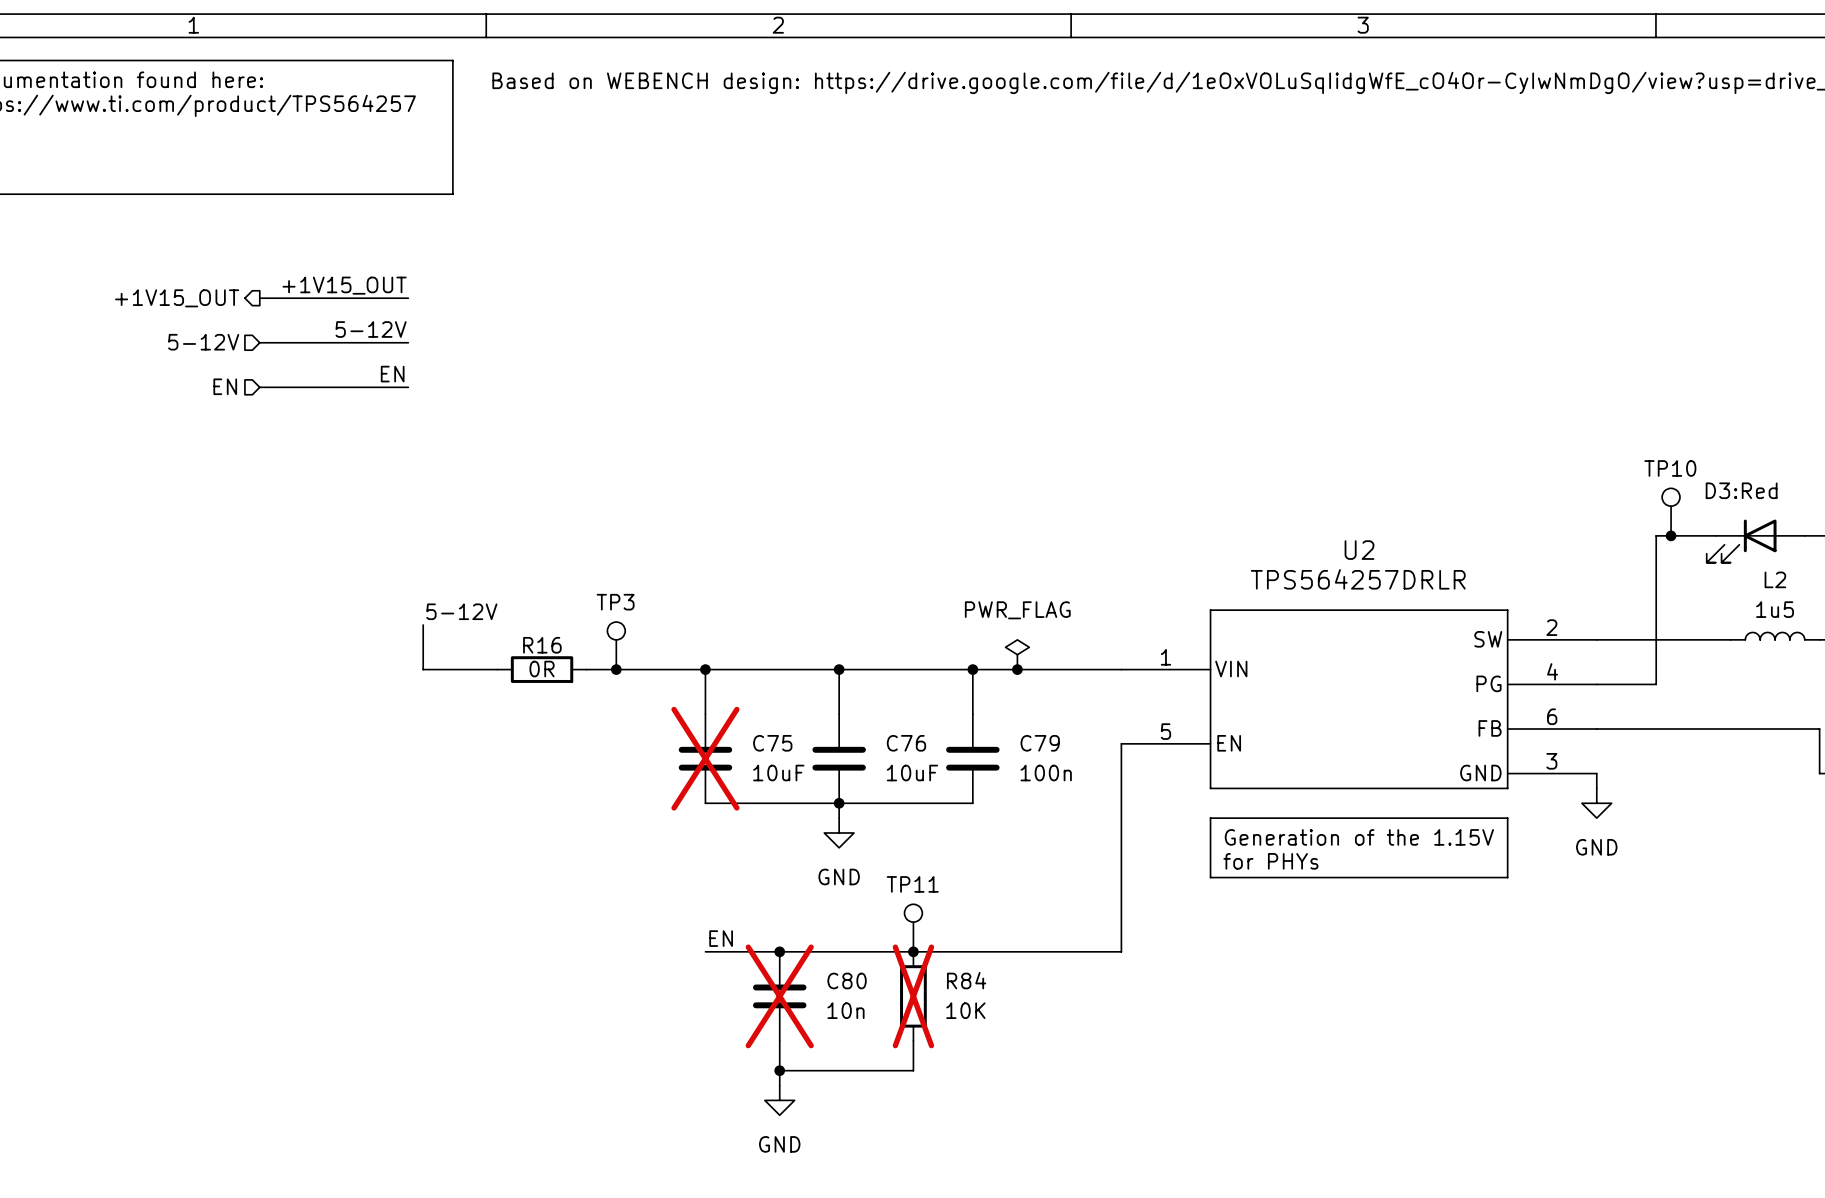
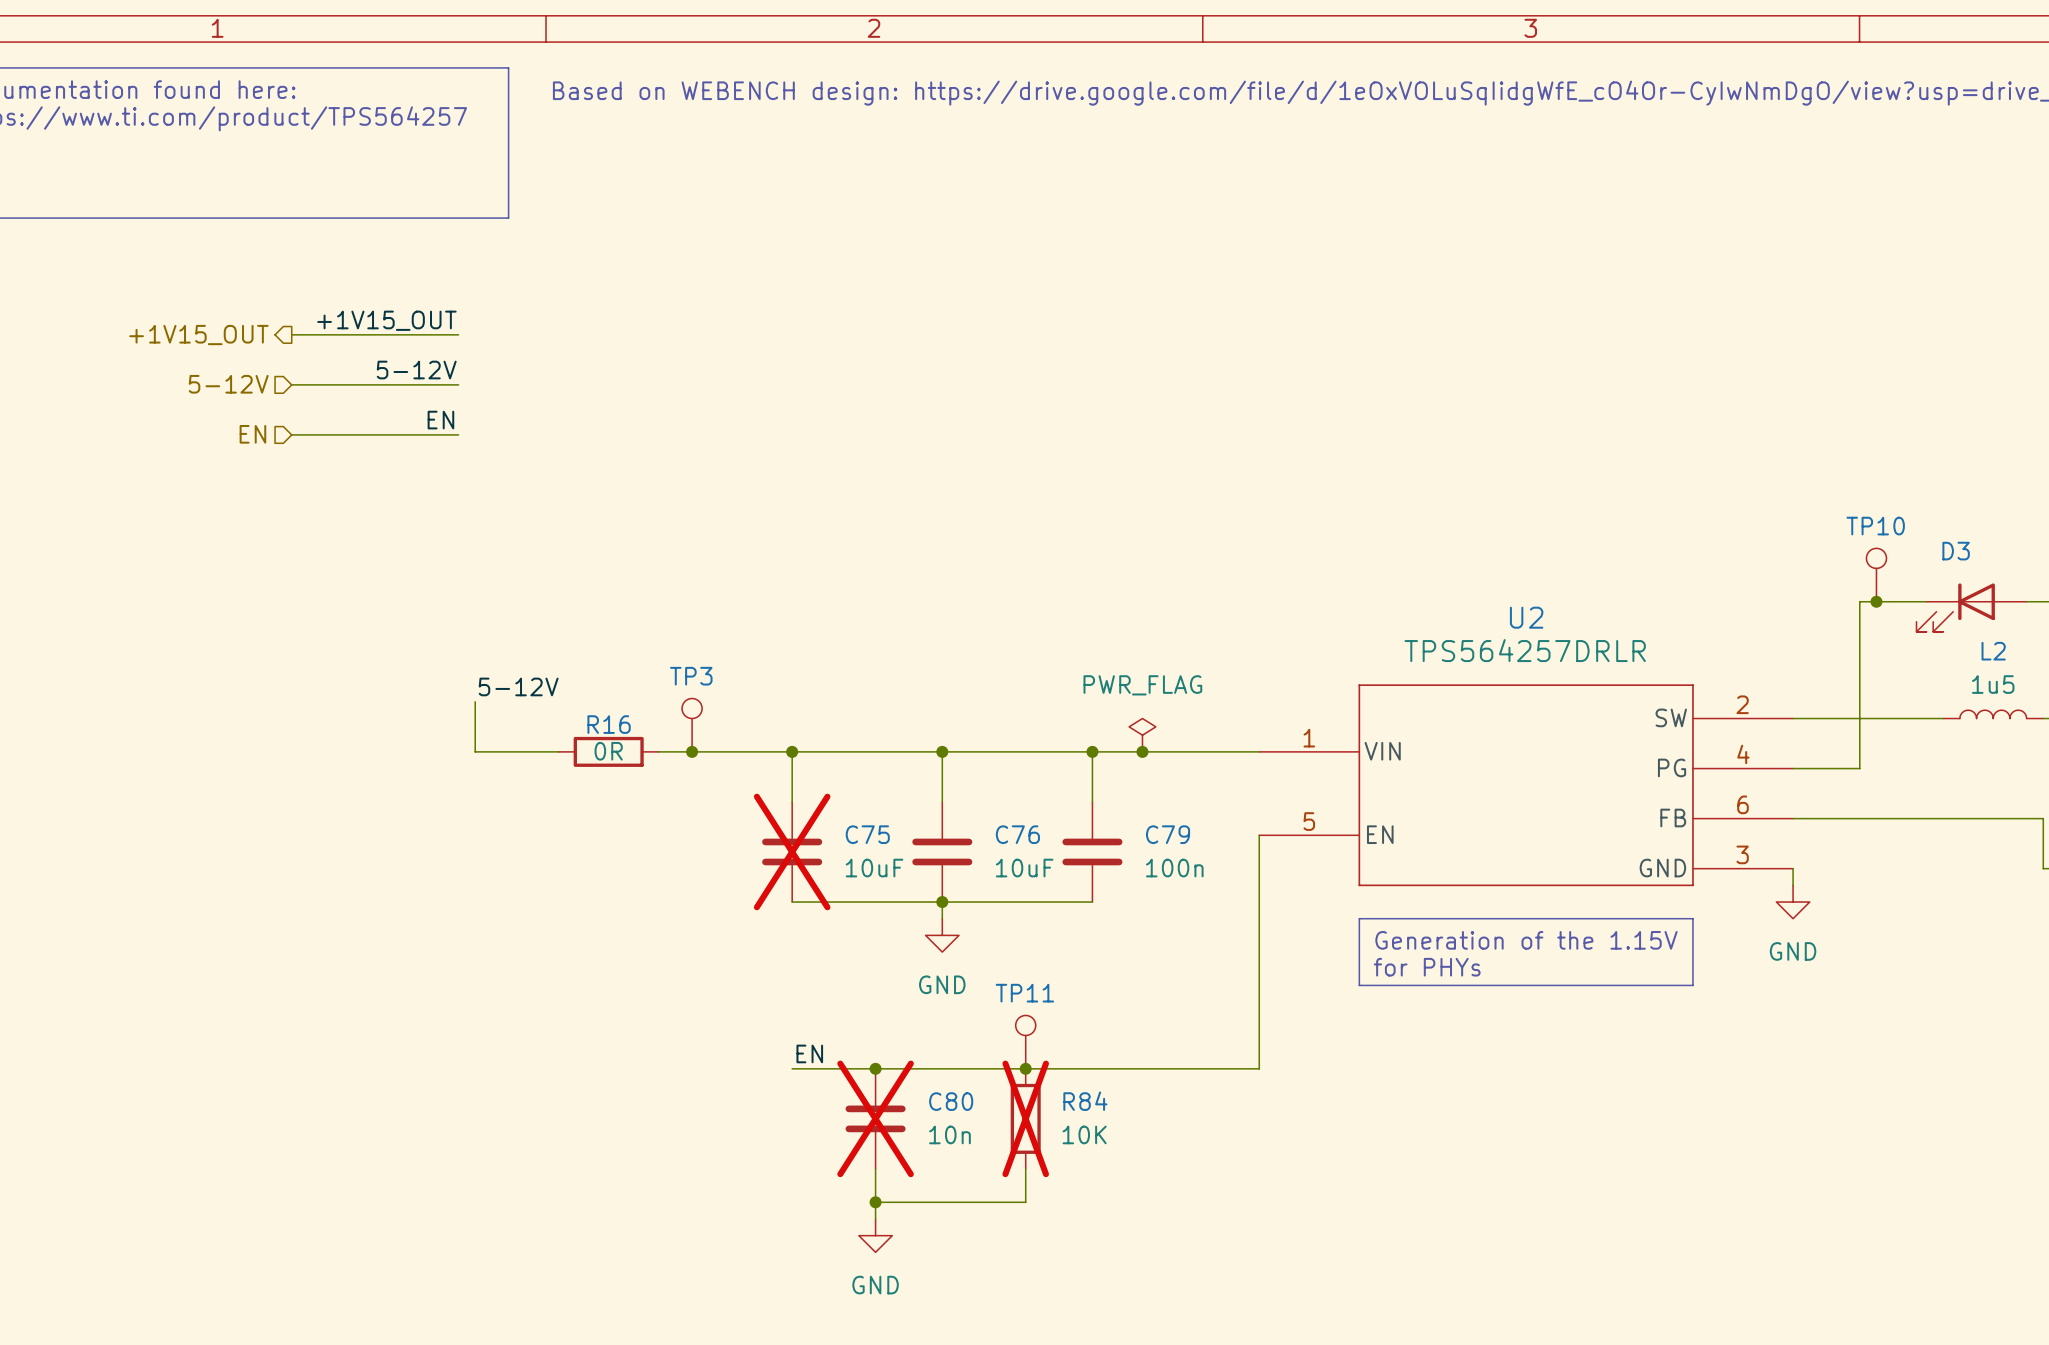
D3 text: D3:Red (1741, 490) -> none
D3 name: none -> D3 (1956, 551)

